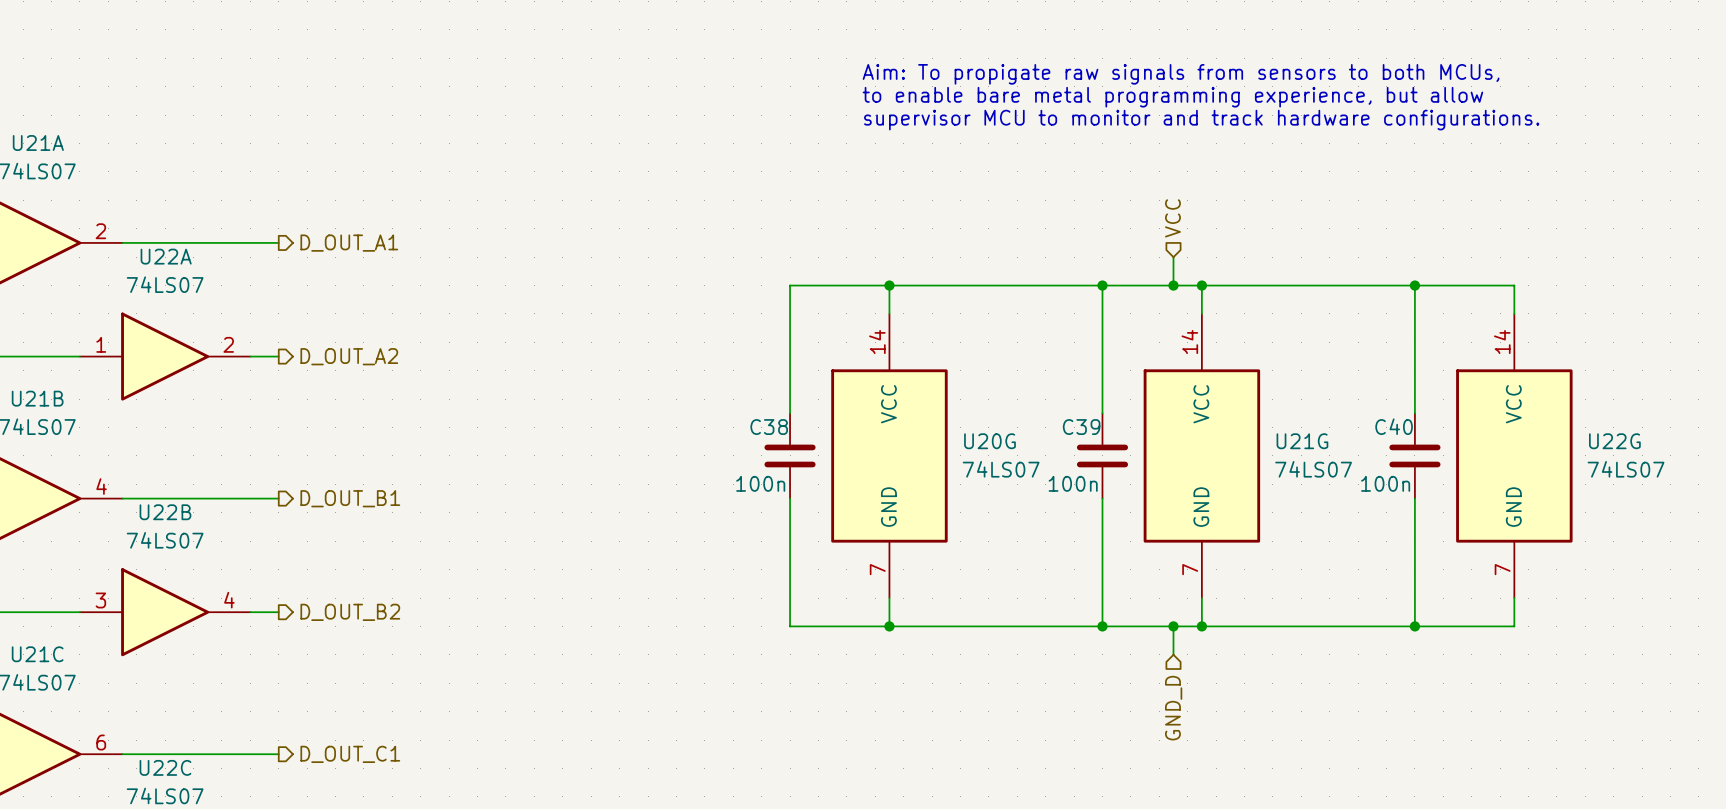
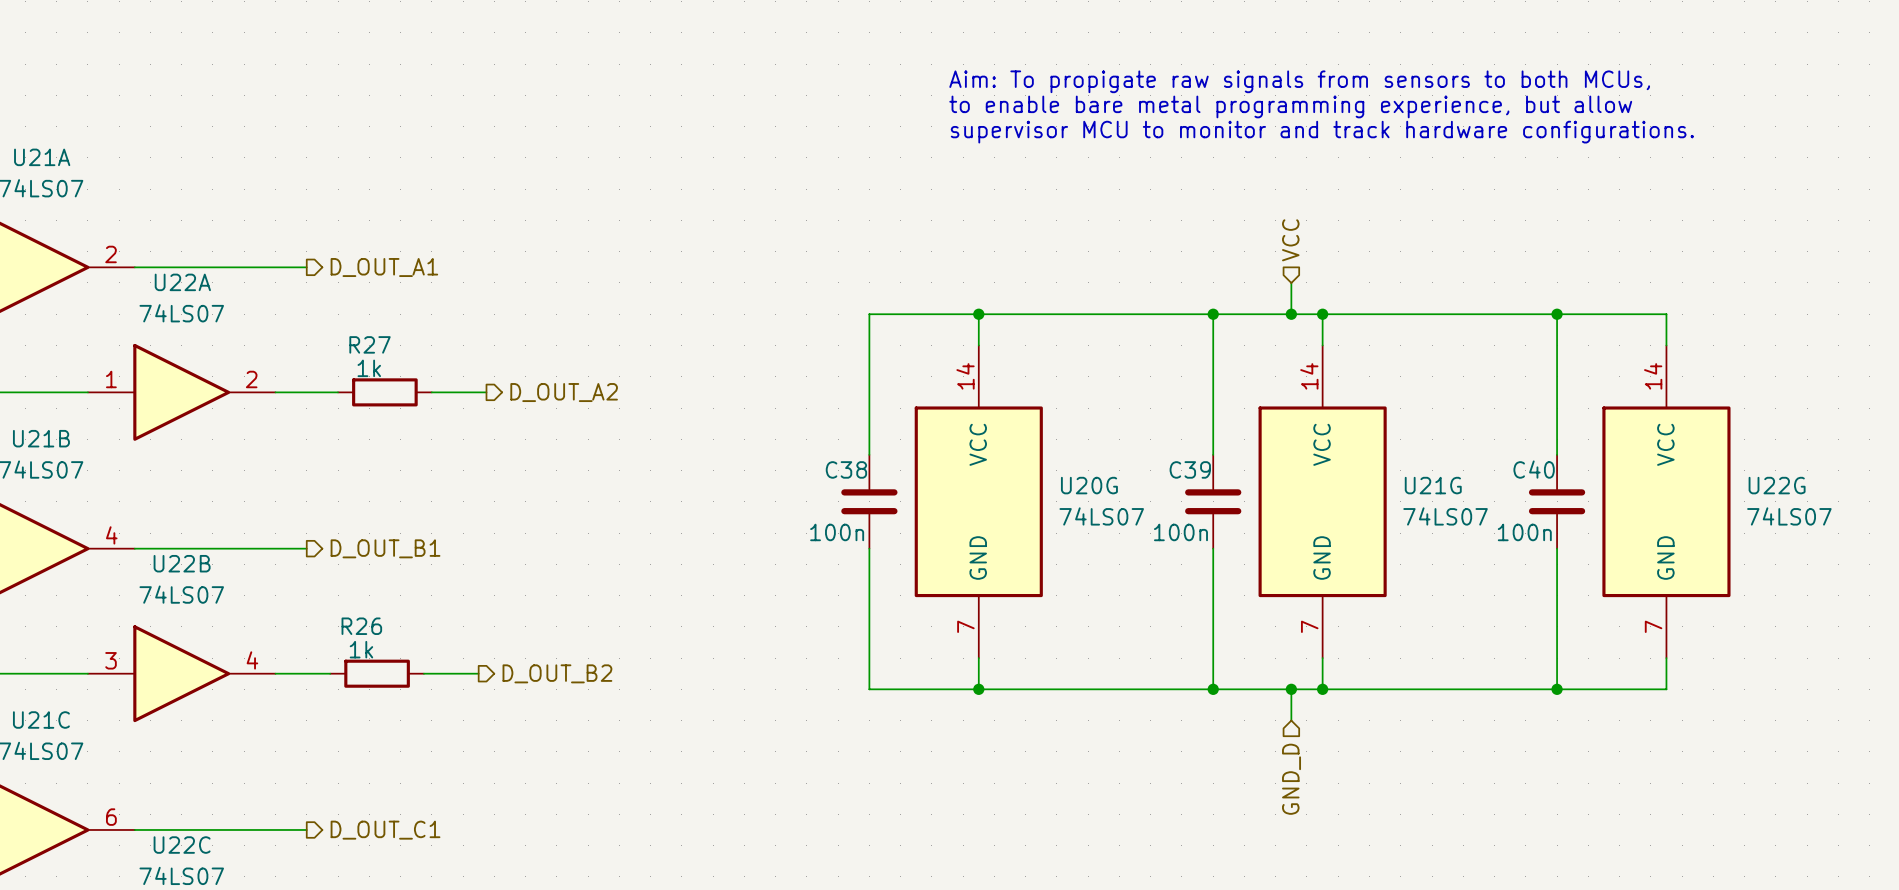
wire: none -> (306, 392) (338, 392)
hierarchical label position: D_OUT_A2 (349, 356) -> D_OUT_A2 (564, 392)
R27: none -> 1k (384, 392)
wire: none -> (431, 392) (486, 392)
wire: none -> (306, 673) (330, 673)
R26: none -> 1k (377, 673)
hierarchical label position: D_OUT_B2 (350, 612) -> D_OUT_B2 (557, 673)
wire: none -> (423, 673) (478, 673)

